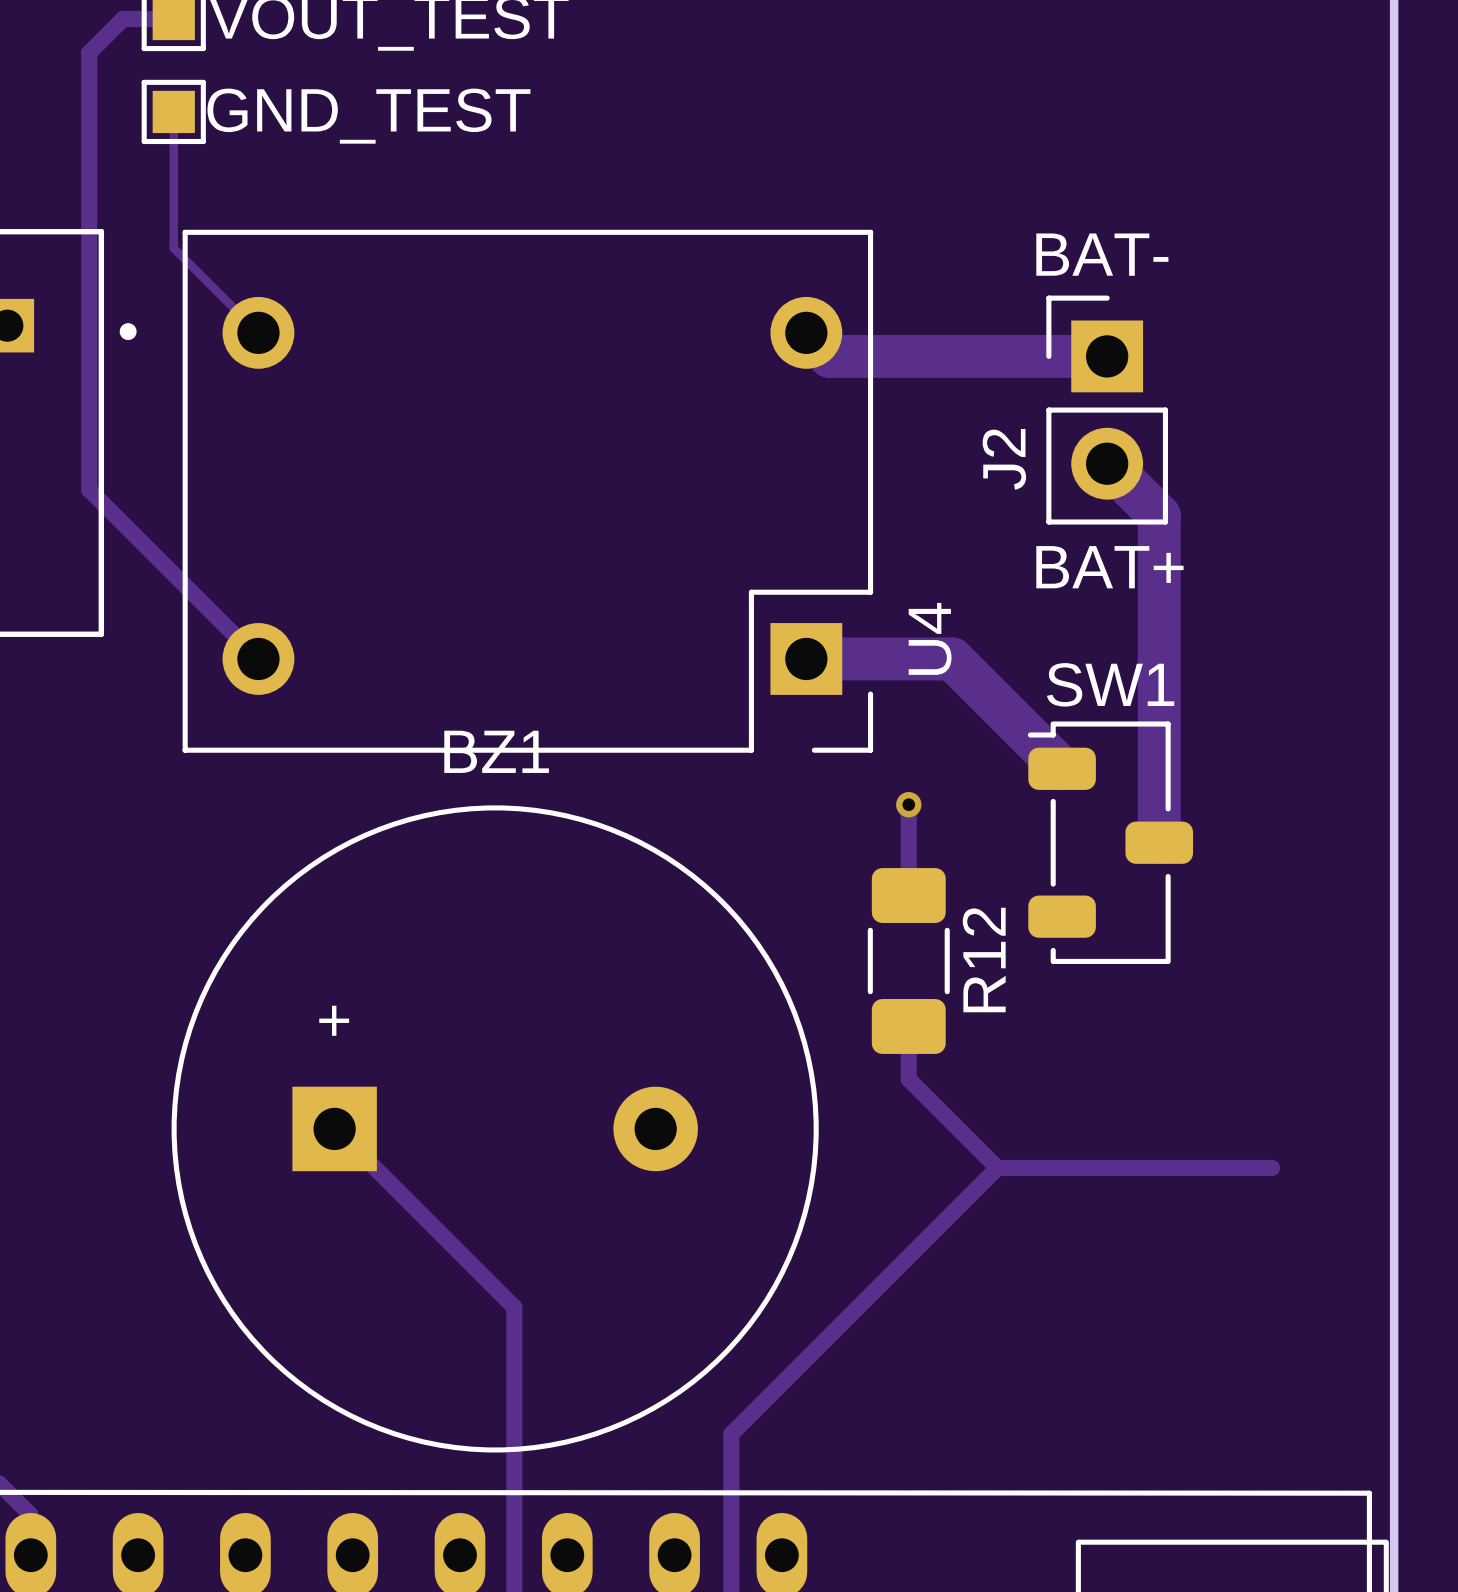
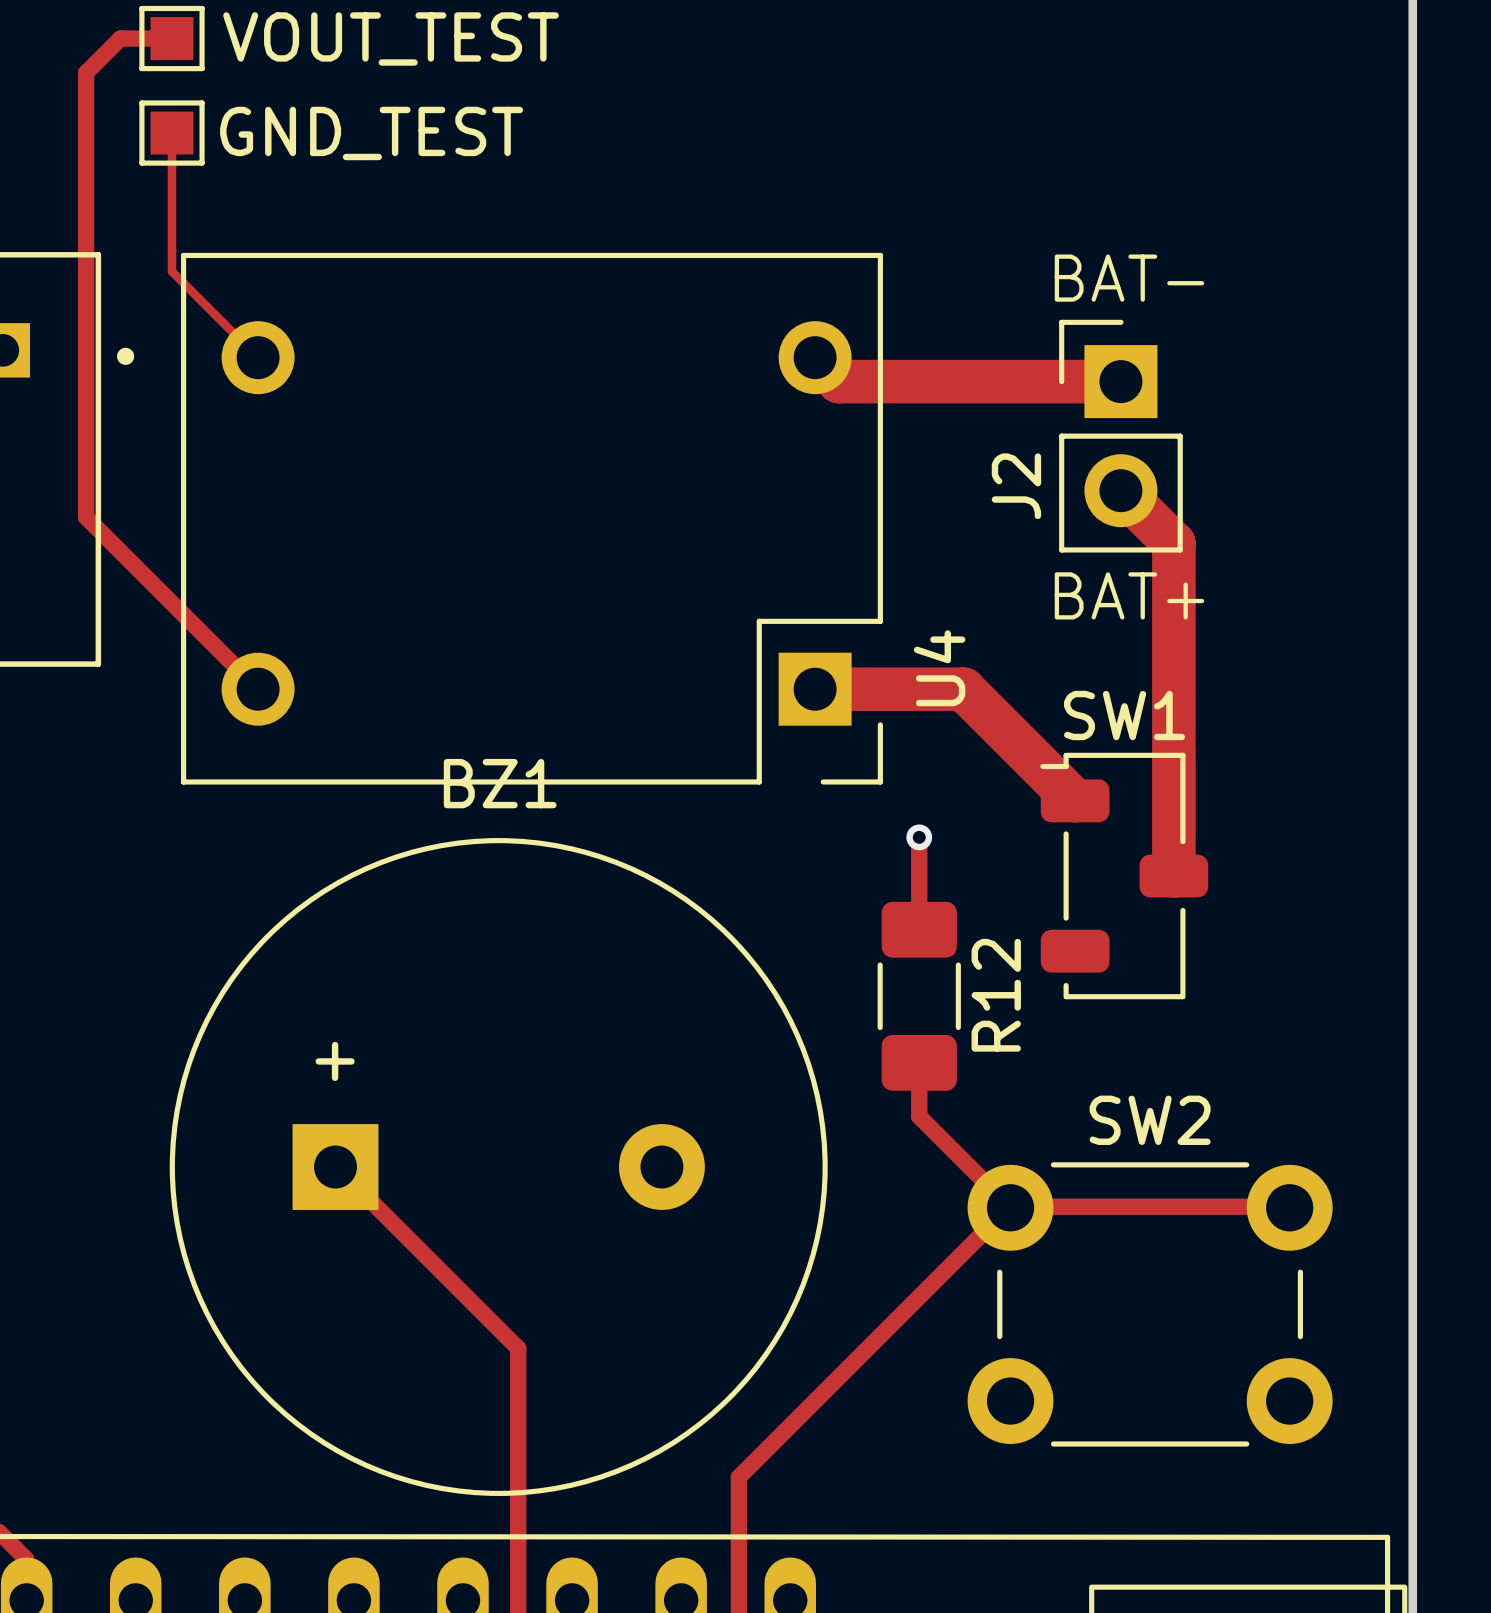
SW2: none -> (1150, 1304)

